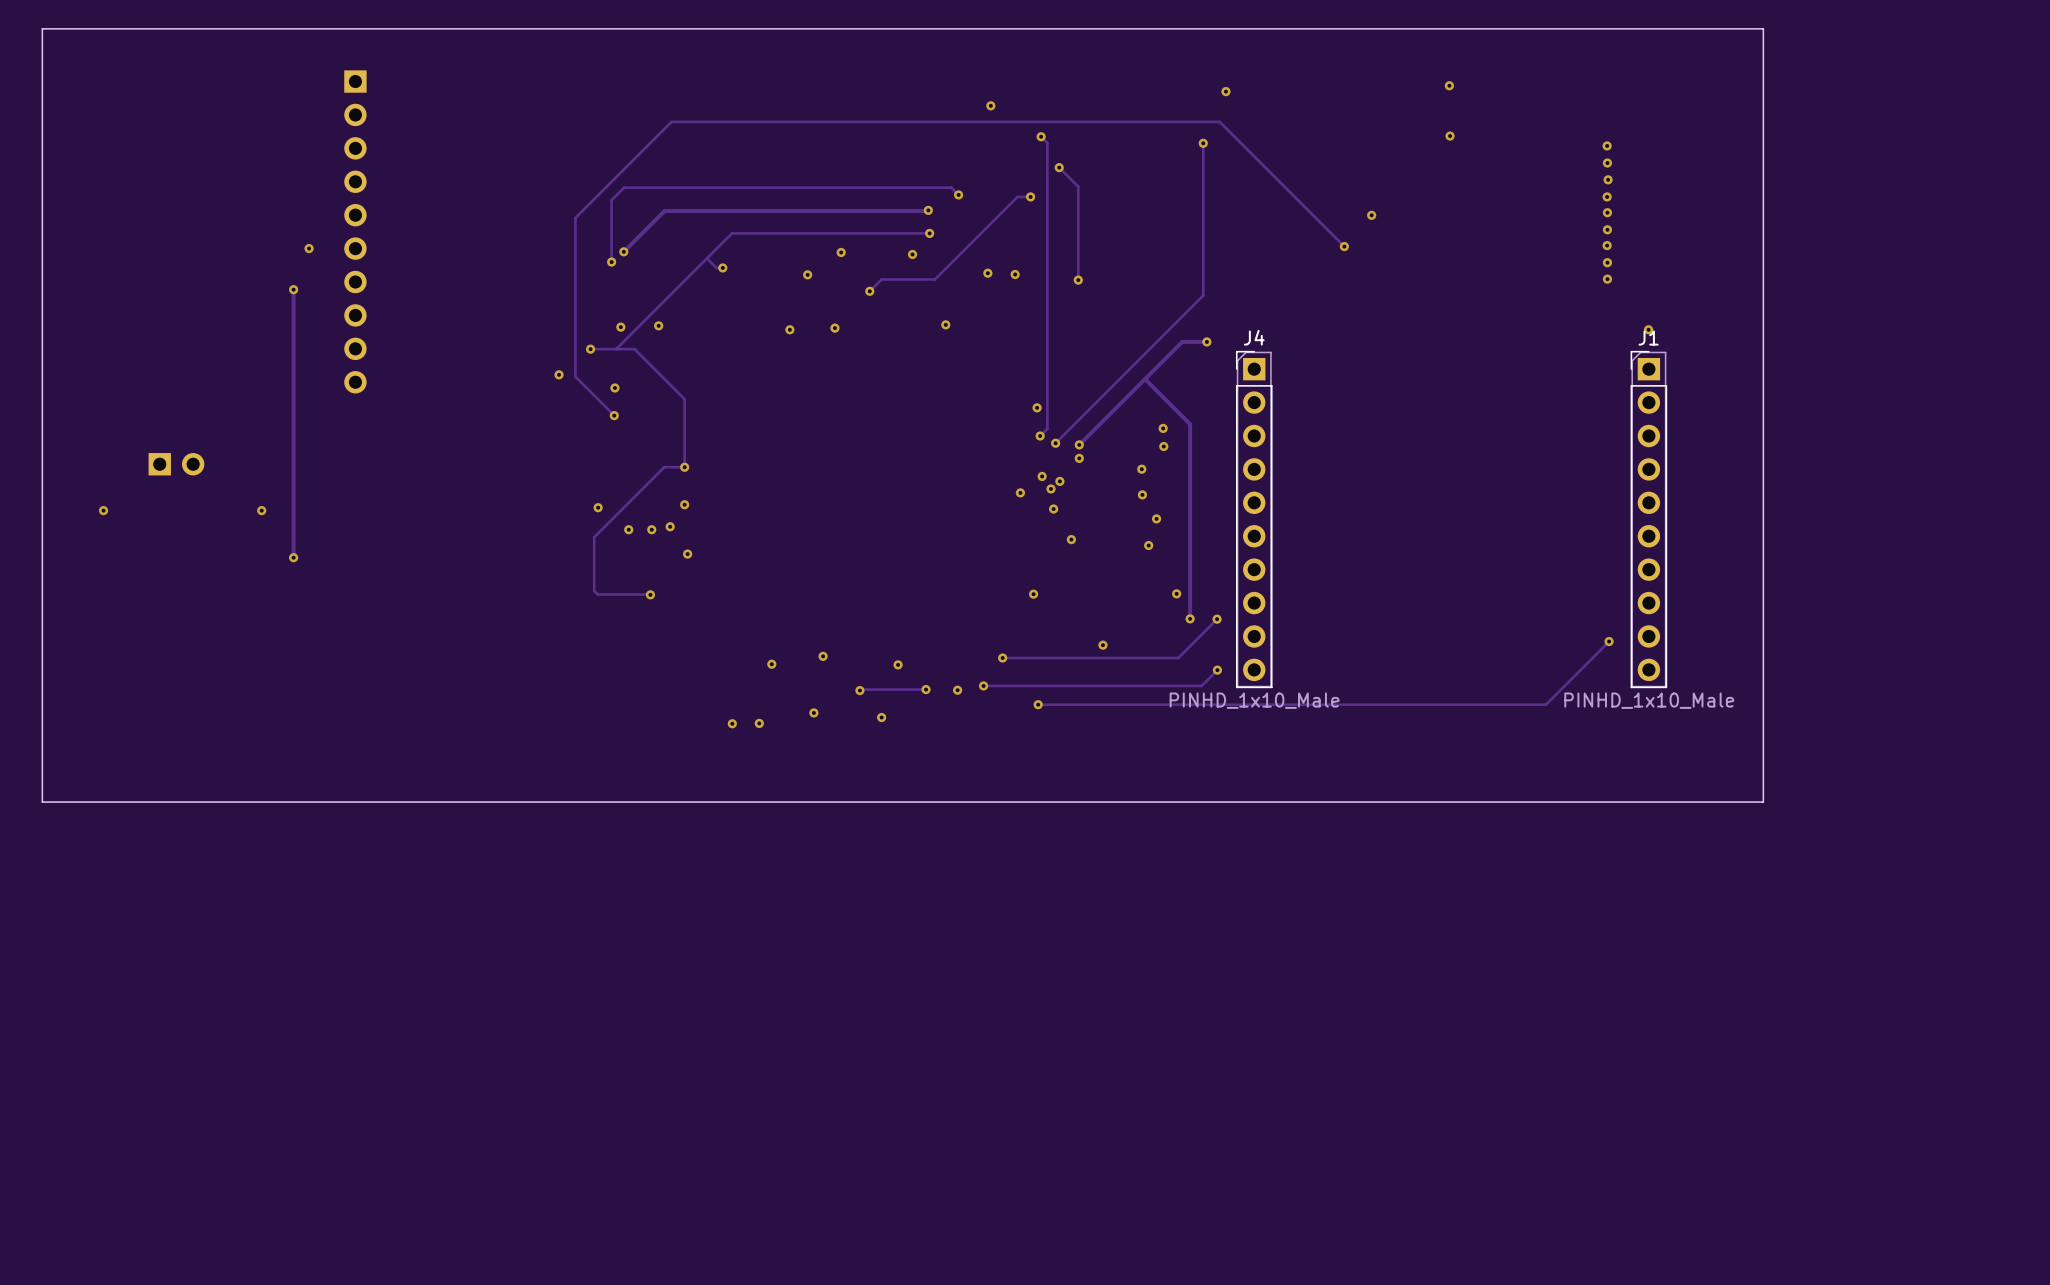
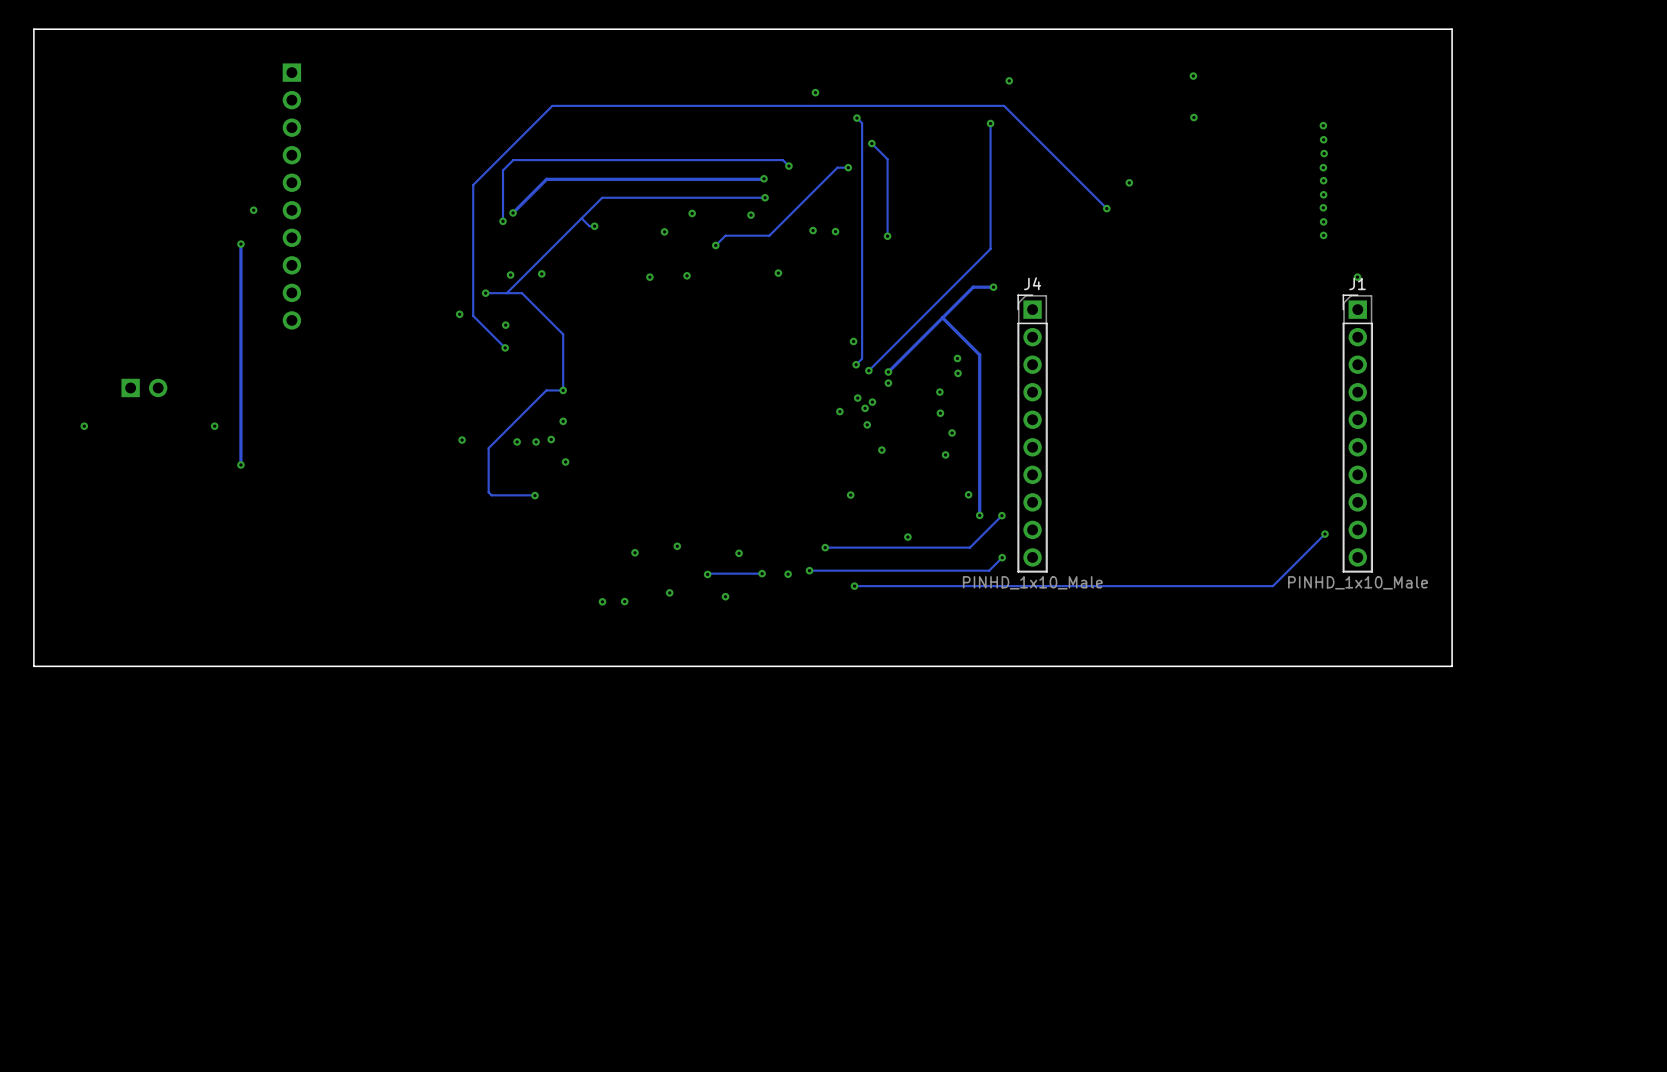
via position: (598, 507) -> (462, 440)

